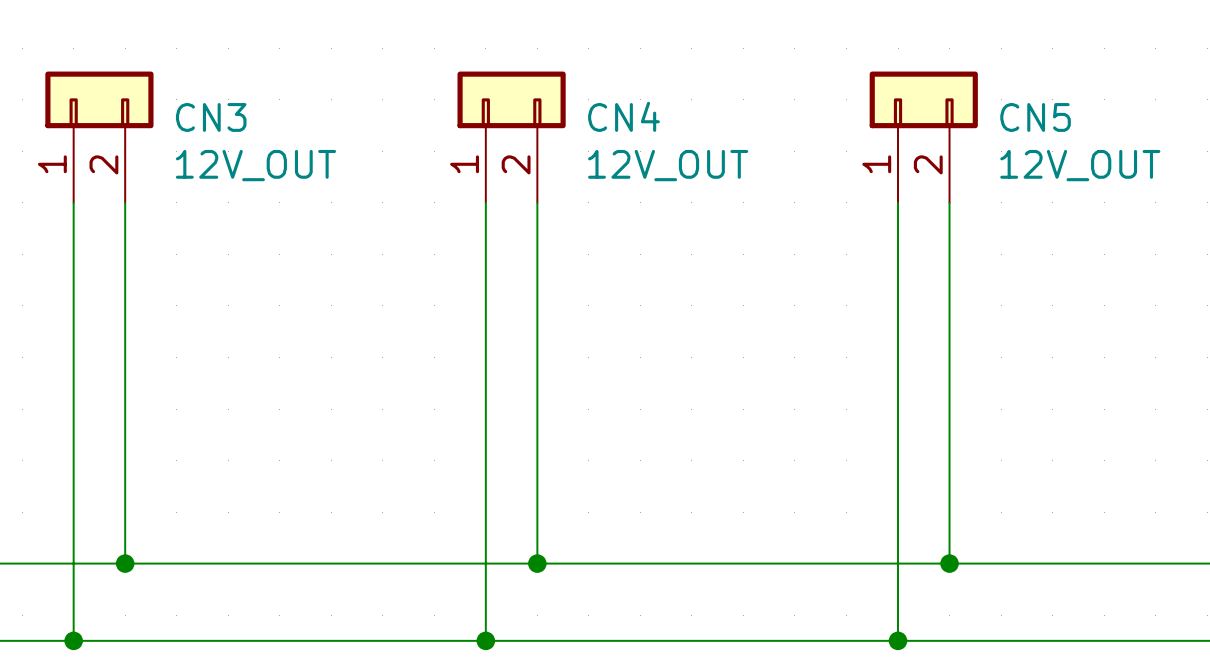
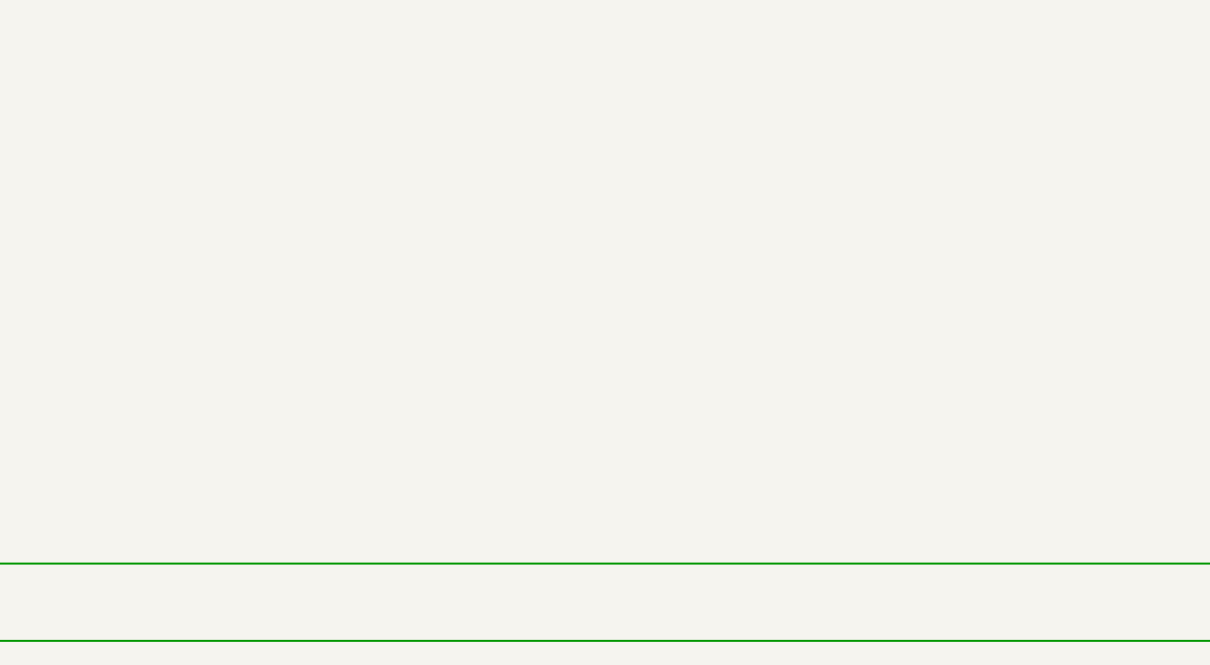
CN3: 12V_OUT (99, 137) -> none
CN4: 12V_OUT (511, 137) -> none
CN5: 12V_OUT (923, 137) -> none
wire: (73, 202) (73, 640) -> none
wire: (125, 202) (125, 563) -> none
wire: (485, 202) (485, 640) -> none
wire: (537, 202) (537, 563) -> none
wire: (898, 202) (898, 640) -> none
wire: (949, 202) (949, 563) -> none
junction: (125, 563) -> none
junction: (537, 563) -> none
junction: (949, 563) -> none
junction: (73, 640) -> none
junction: (485, 640) -> none
junction: (898, 640) -> none

